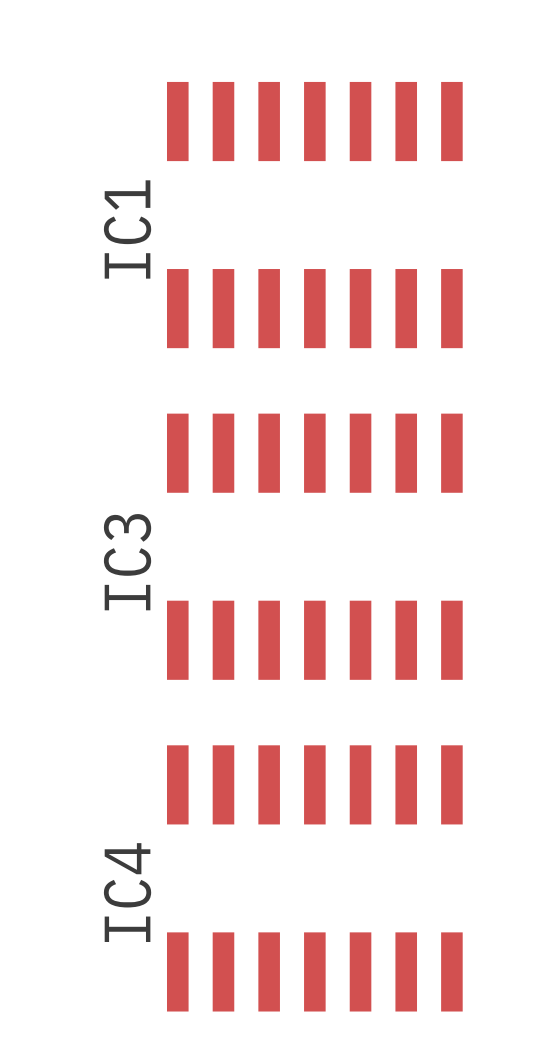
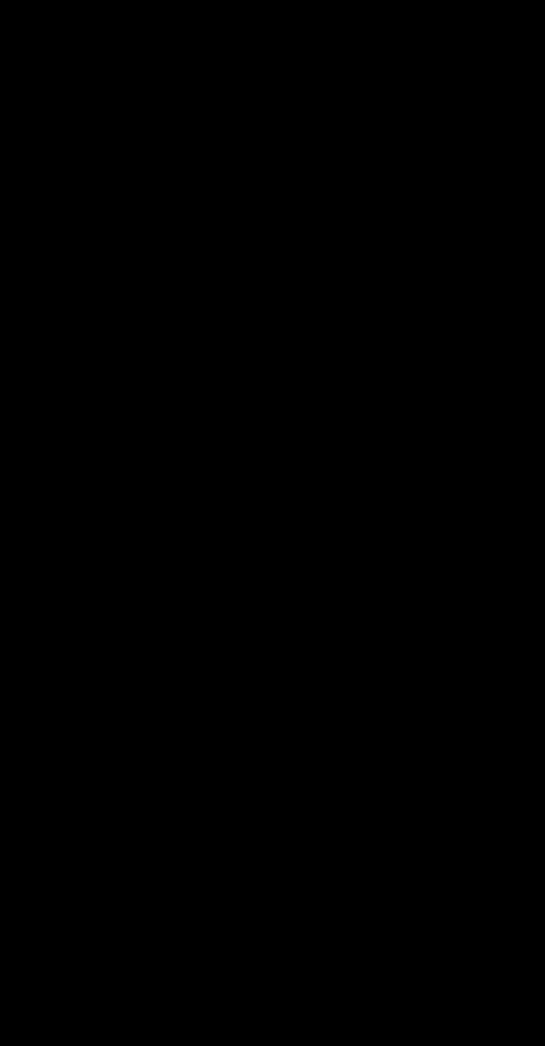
IC1: (314, 215) -> none
IC3: (314, 546) -> none
IC4: (314, 878) -> none

